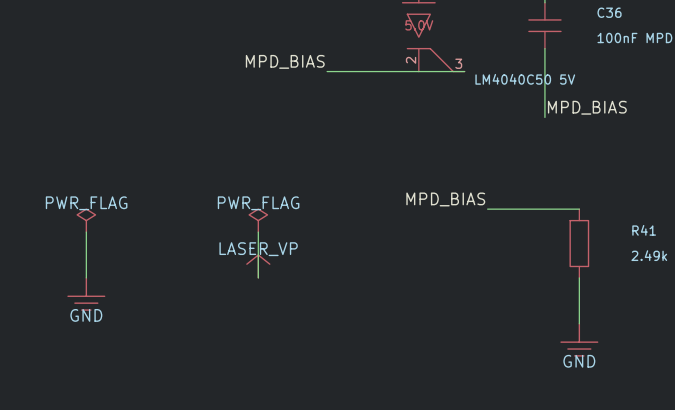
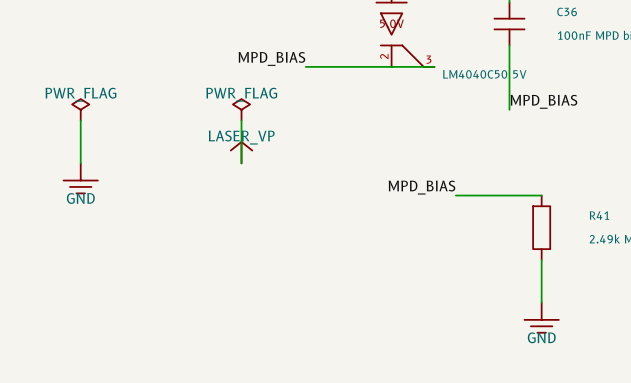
power symbol: none -> PWR_FLAG (80, 109)
power symbol: none -> PWR_FLAG (241, 109)
power symbol: PWR_FLAG (86, 220) -> none
power symbol: PWR_FLAG (258, 220) -> none
wire: (86, 232) (86, 277) -> (80, 120) (80, 163)
wire: (258, 232) (258, 277) -> (241, 120) (241, 163)
power symbol position: LASER_VP (258, 266) -> LASER_VP (241, 152)
power symbol position: GND (86, 293) -> GND (80, 178)

